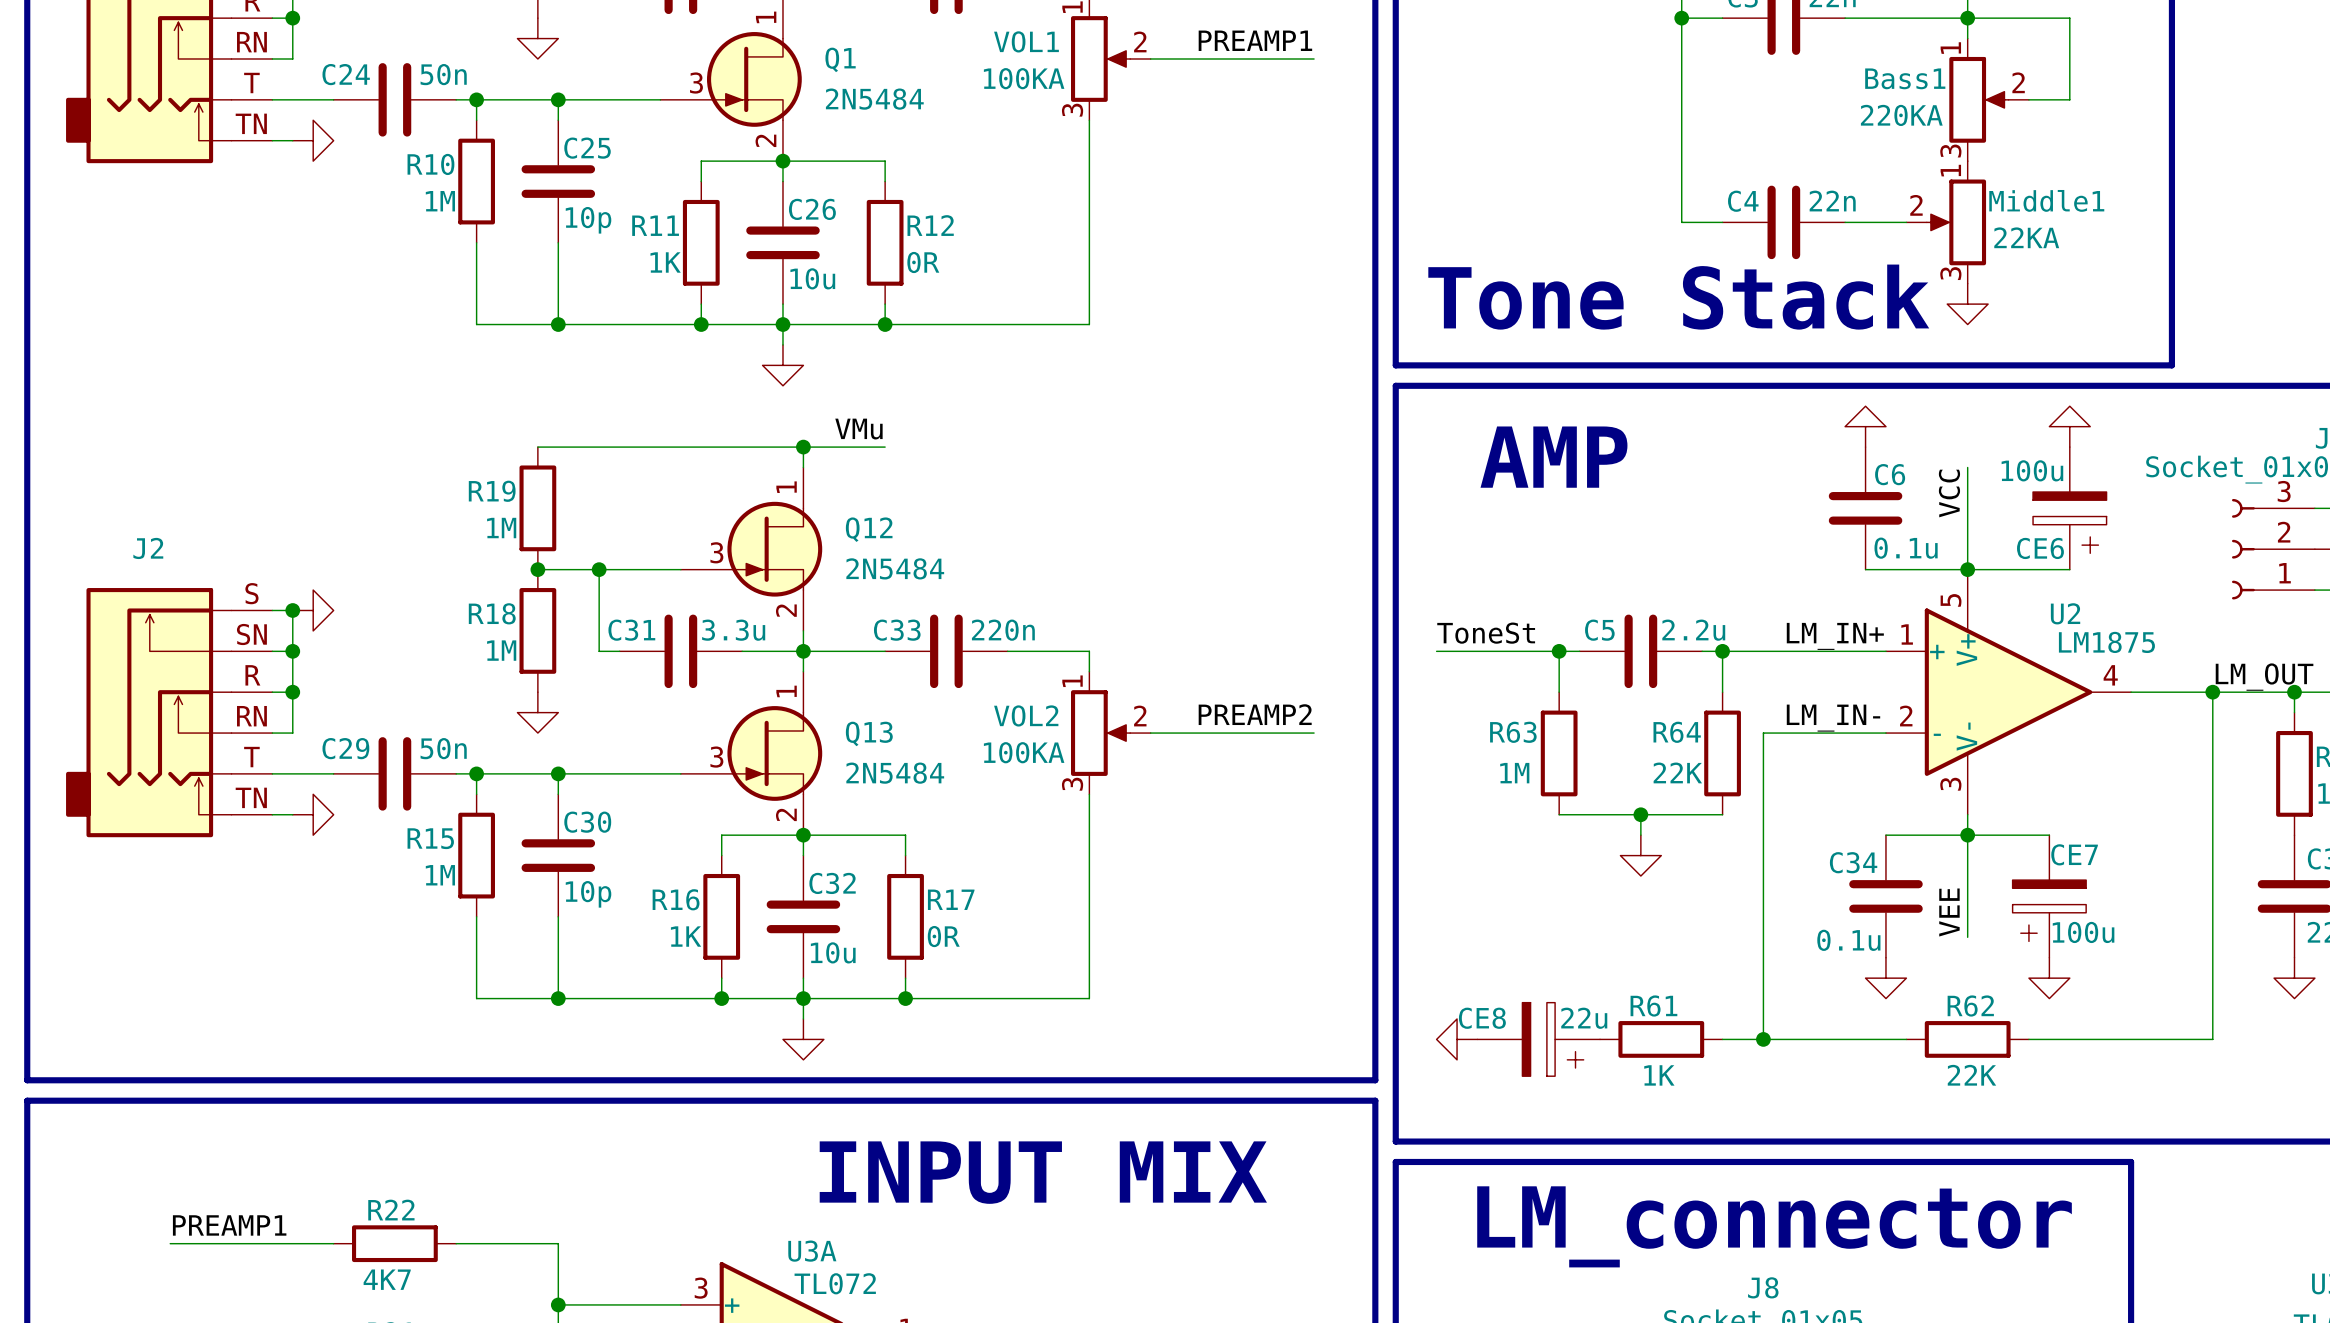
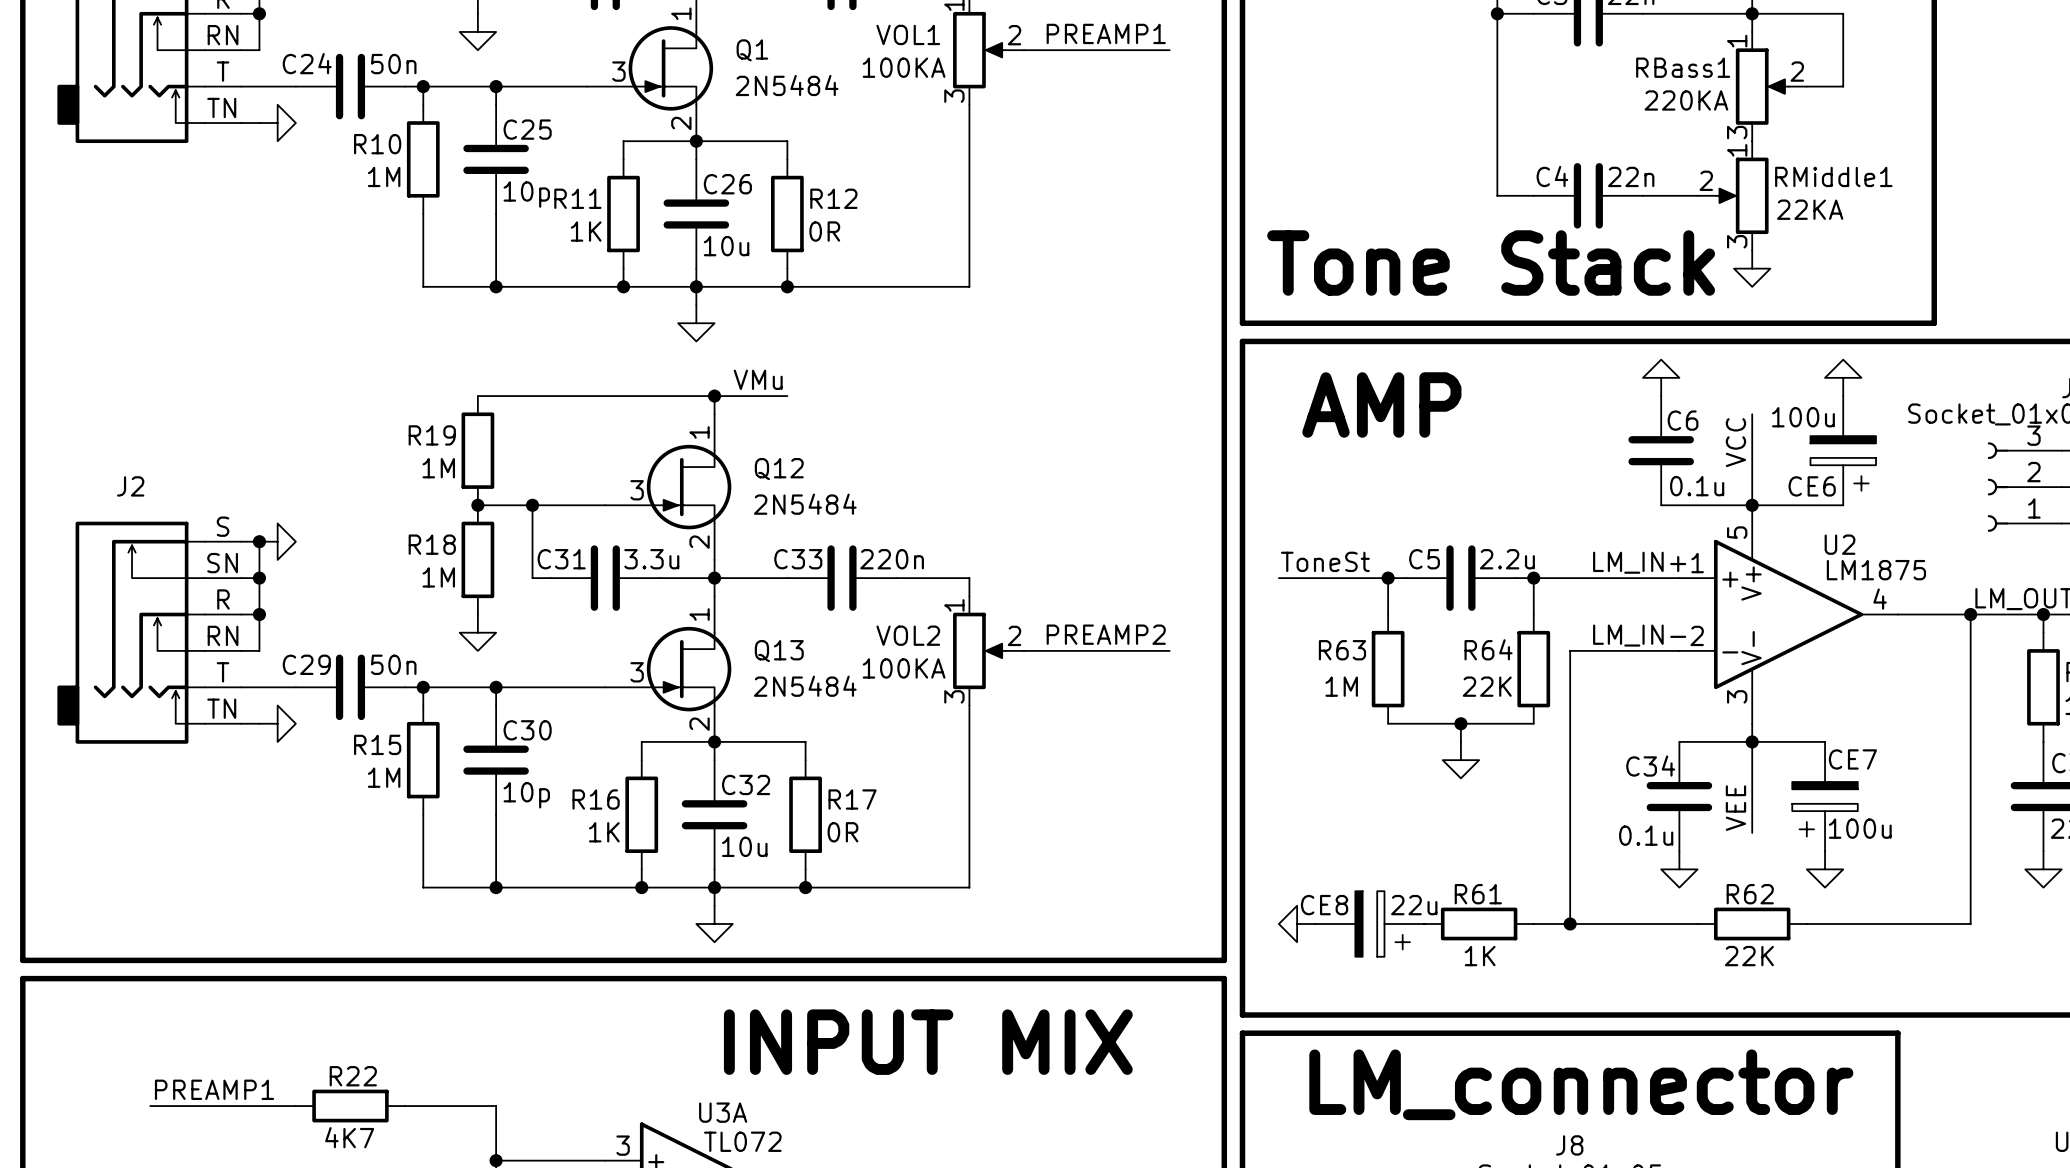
Bass1 name: Bass1 (1905, 78) -> RBass1 (1683, 67)
Middle1 name: Middle1 (2046, 200) -> RMiddle1 (1833, 176)

